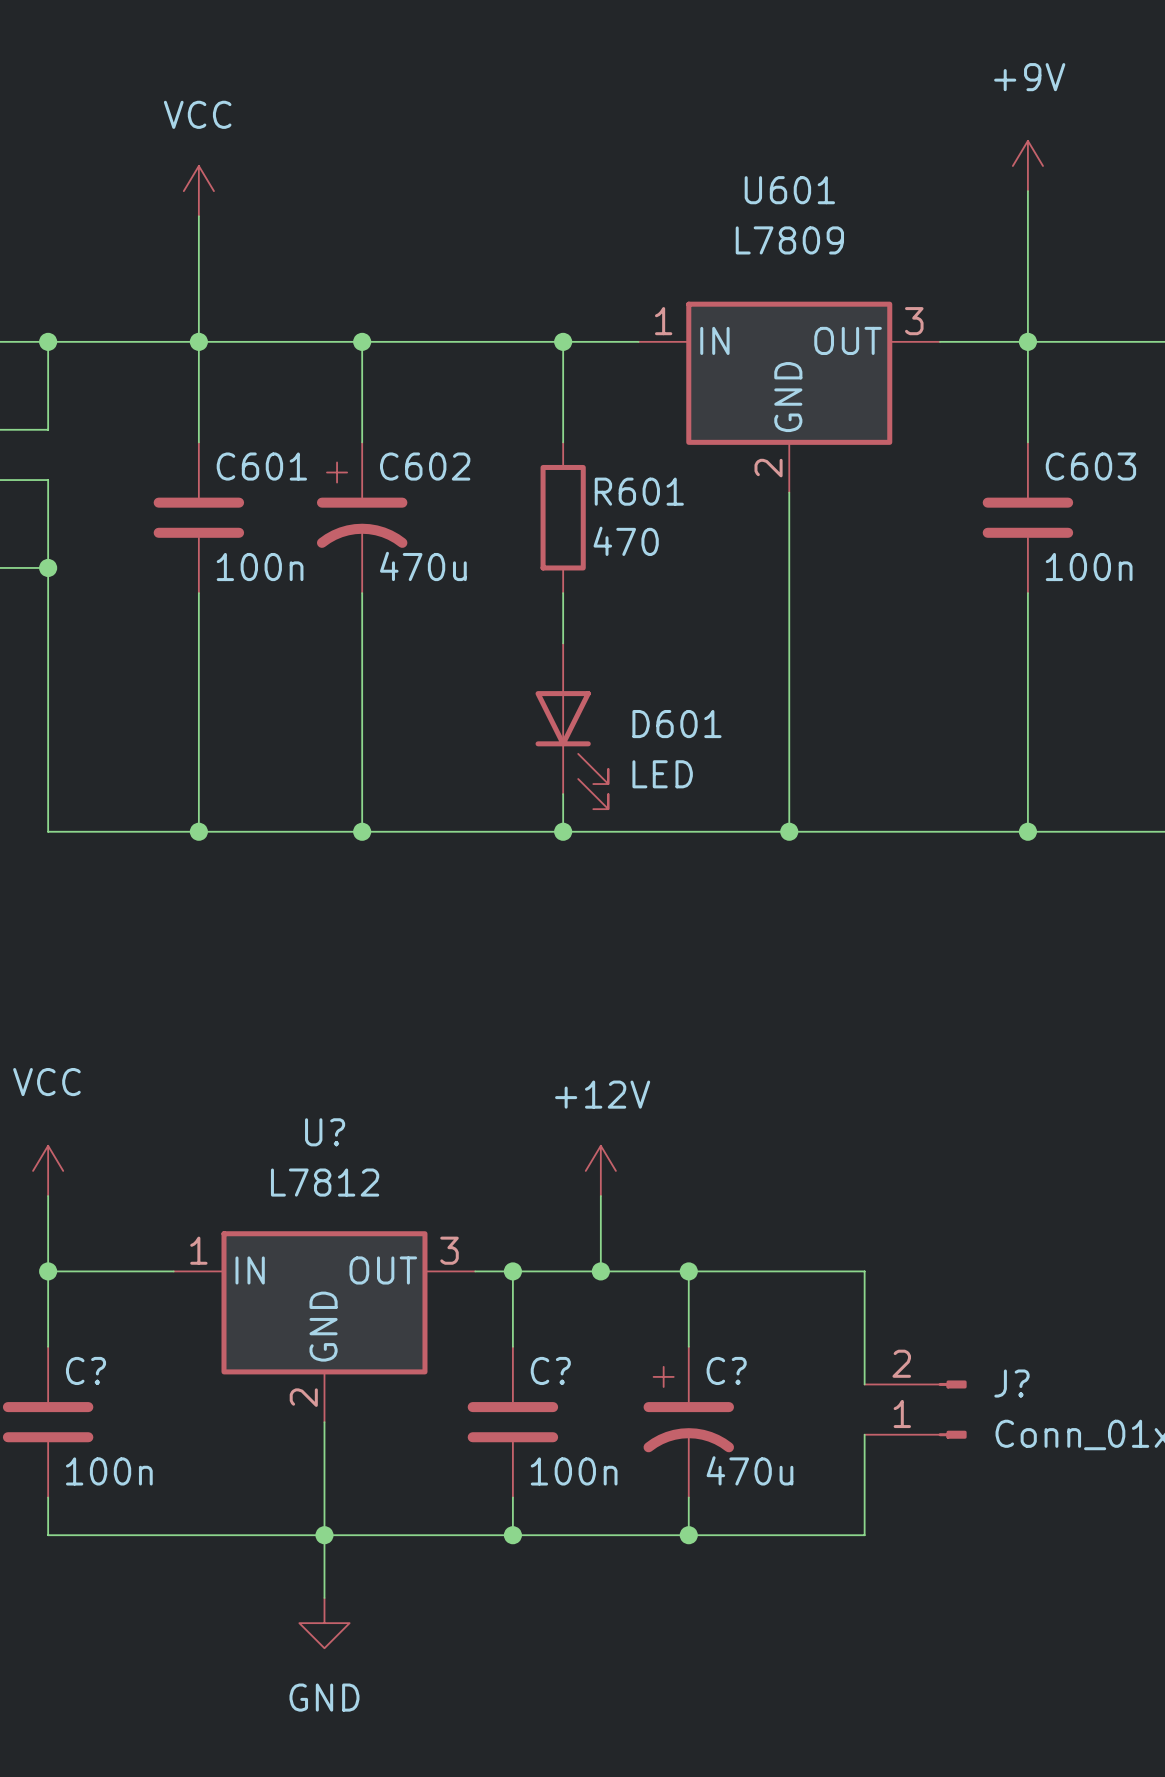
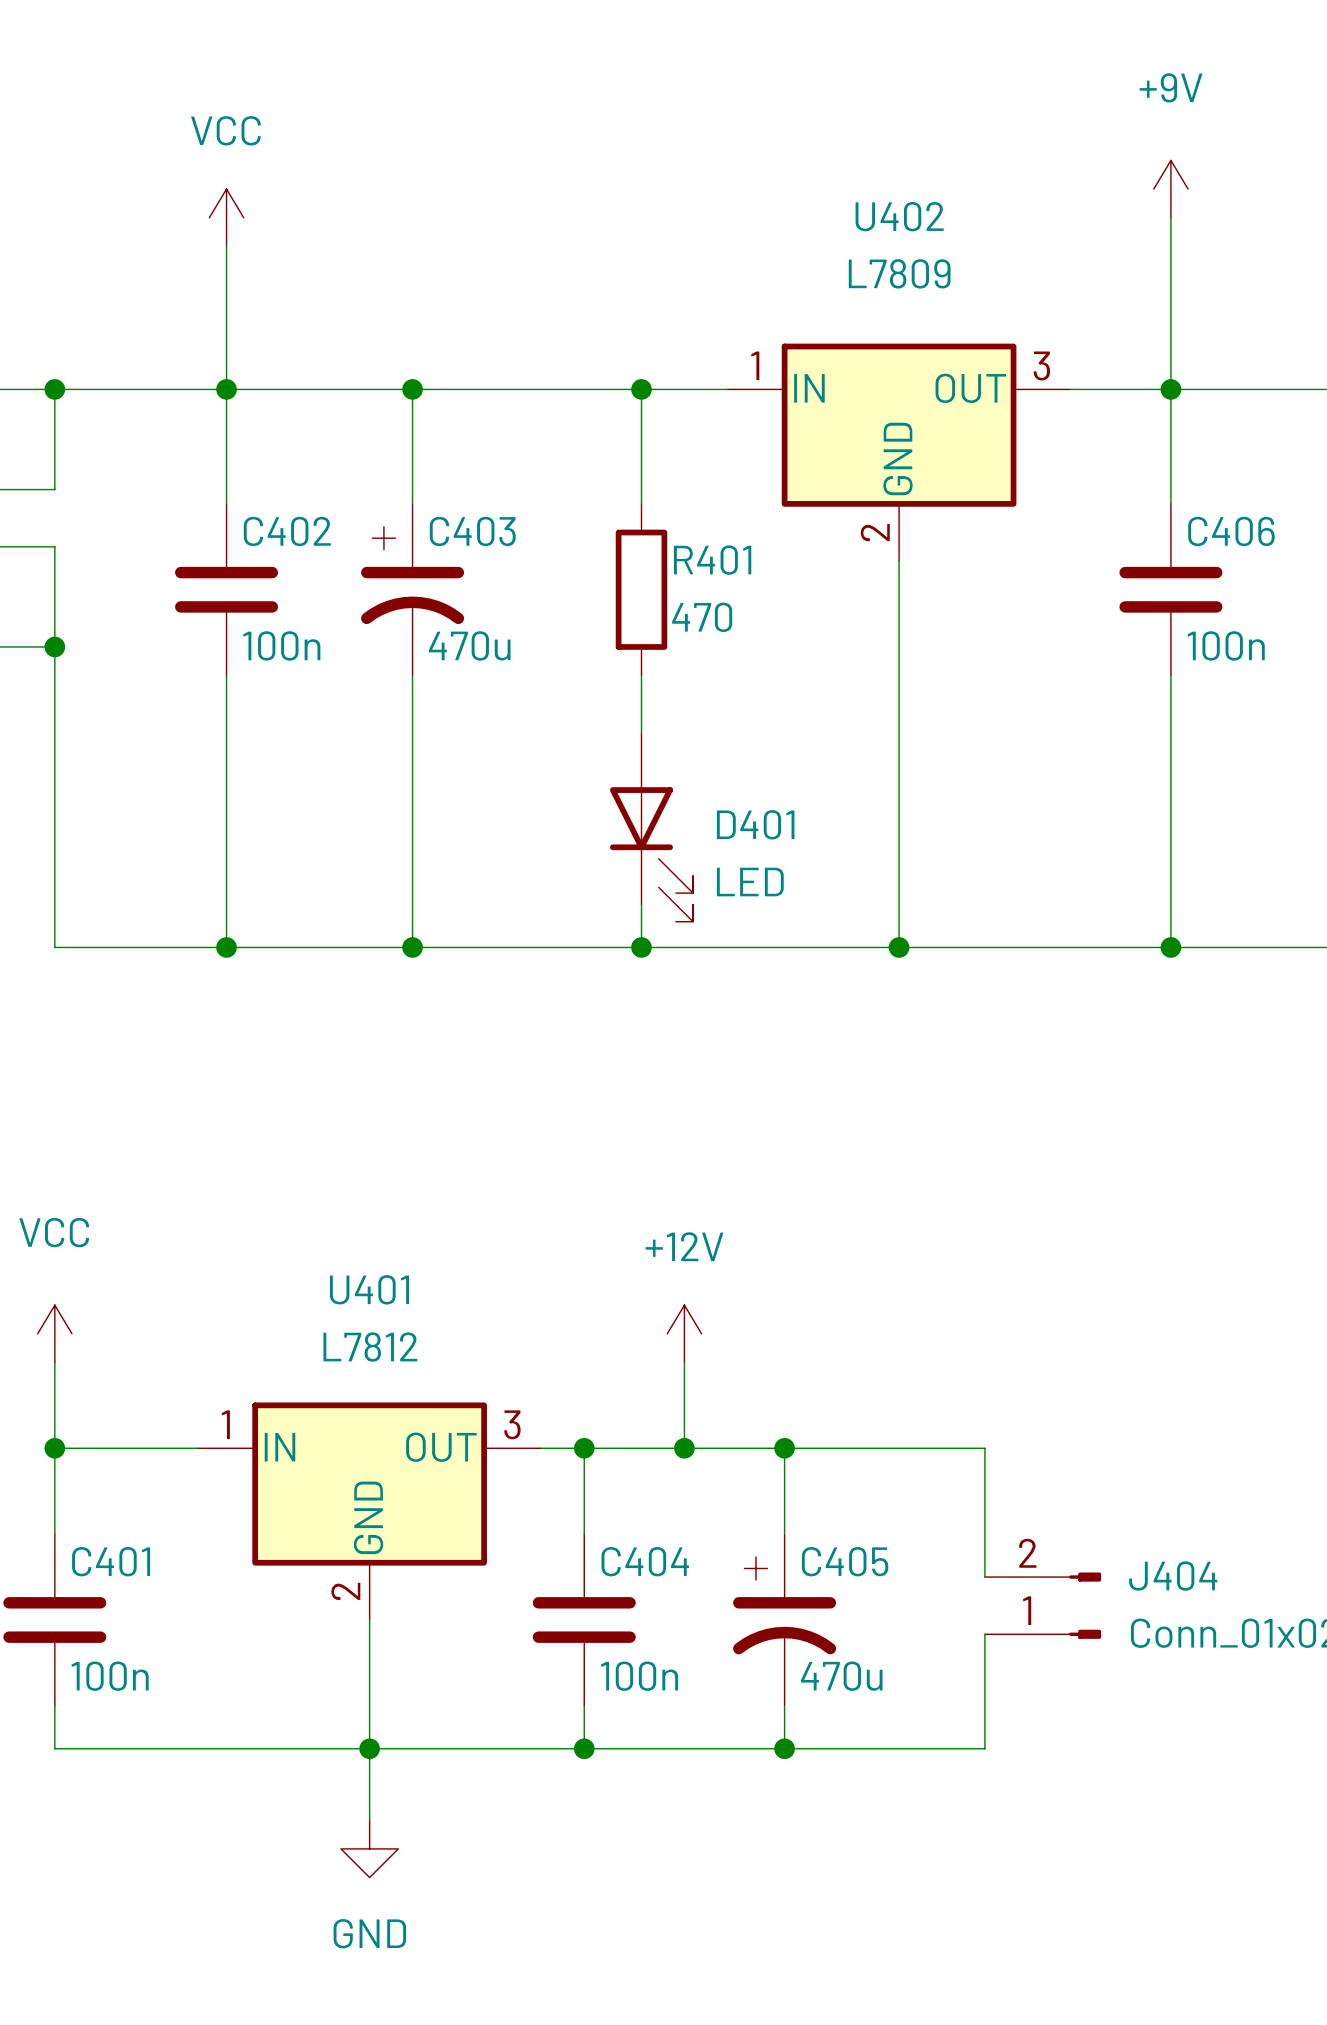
U601 name: U601 (789, 190) -> U402 (899, 216)
C601 name: C601 (261, 466) -> C402 (287, 531)
C602 name: C602 (425, 466) -> C403 (472, 531)
C603 name: C603 (1090, 466) -> C406 (1231, 531)
R601 name: R601 (639, 491) -> R401 (712, 560)
D601 name: D601 (677, 724) -> D401 (755, 824)
U? name: U? (325, 1132) -> U401 (369, 1289)
C? name: C? (86, 1370) -> C401 (111, 1561)
C? name: C? (550, 1370) -> C404 (645, 1561)
C? name: C? (726, 1370) -> C405 (845, 1561)
J? name: J? (1011, 1383) -> J404 (1173, 1576)

